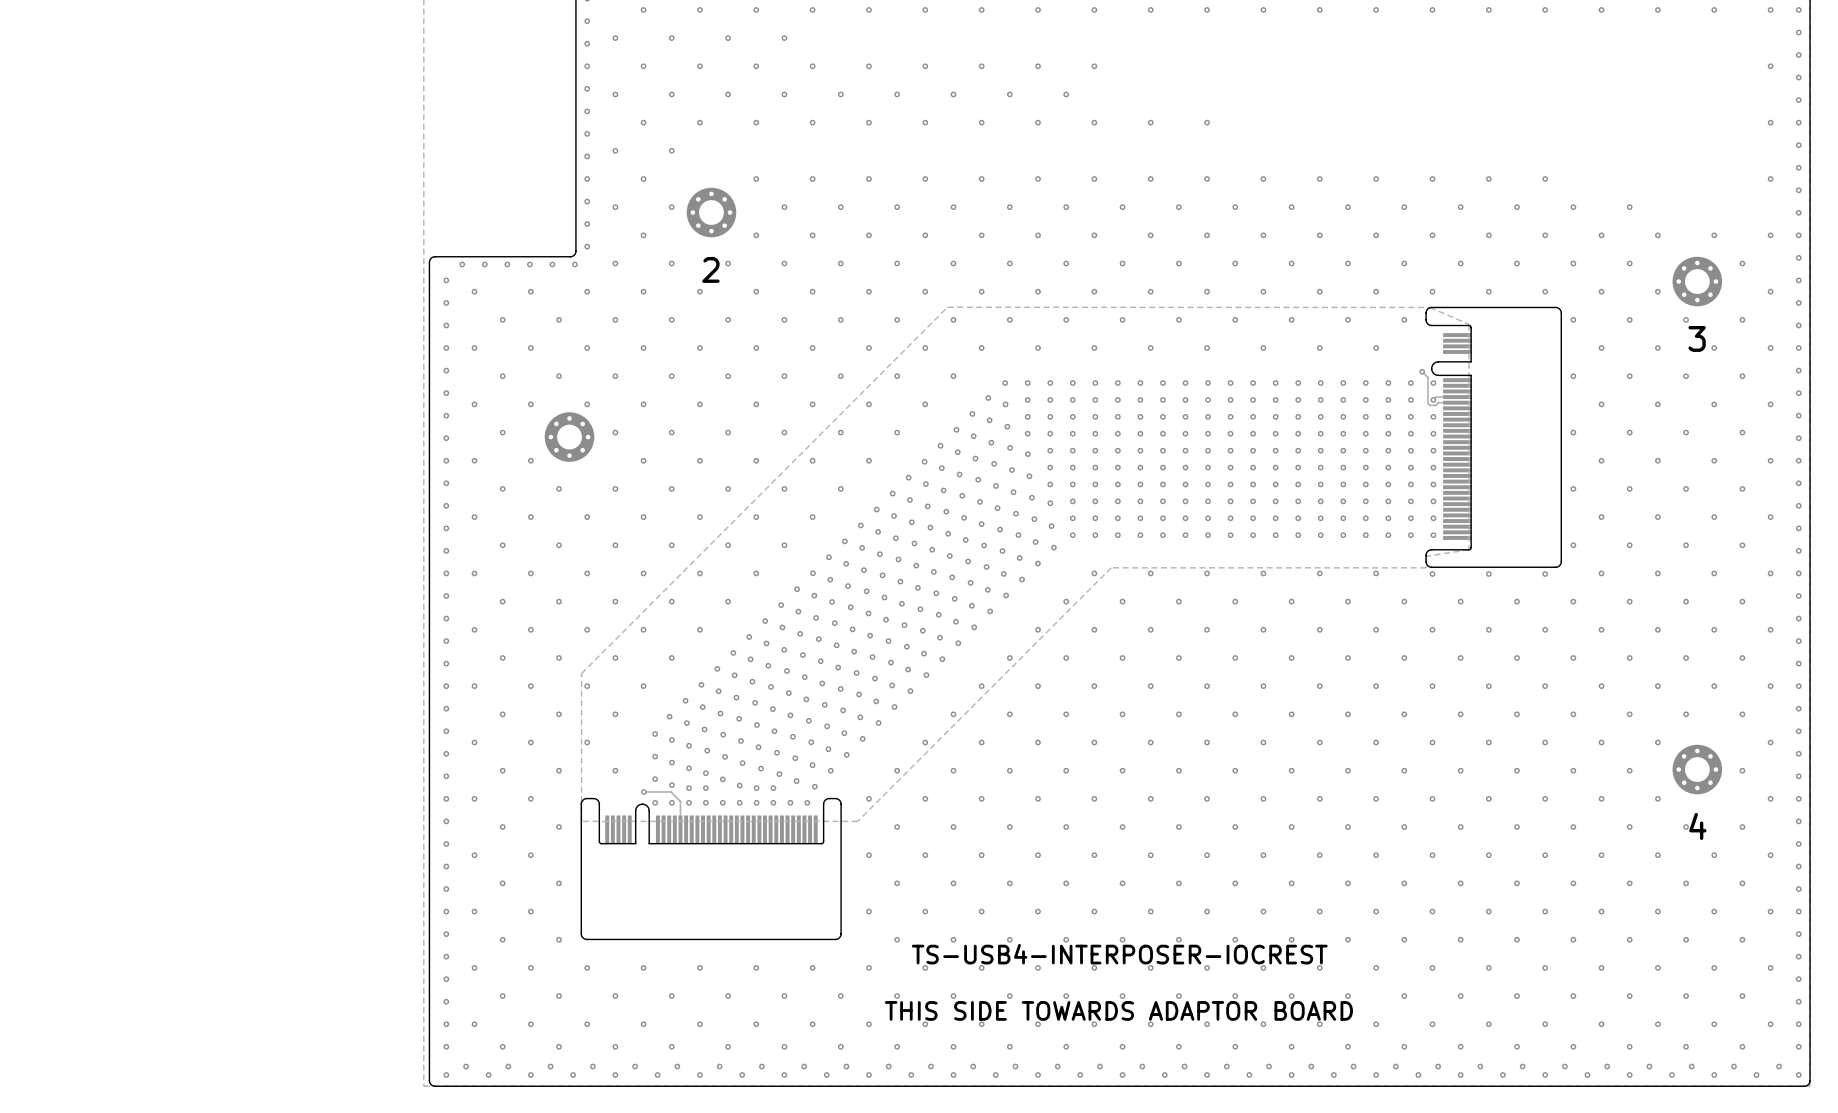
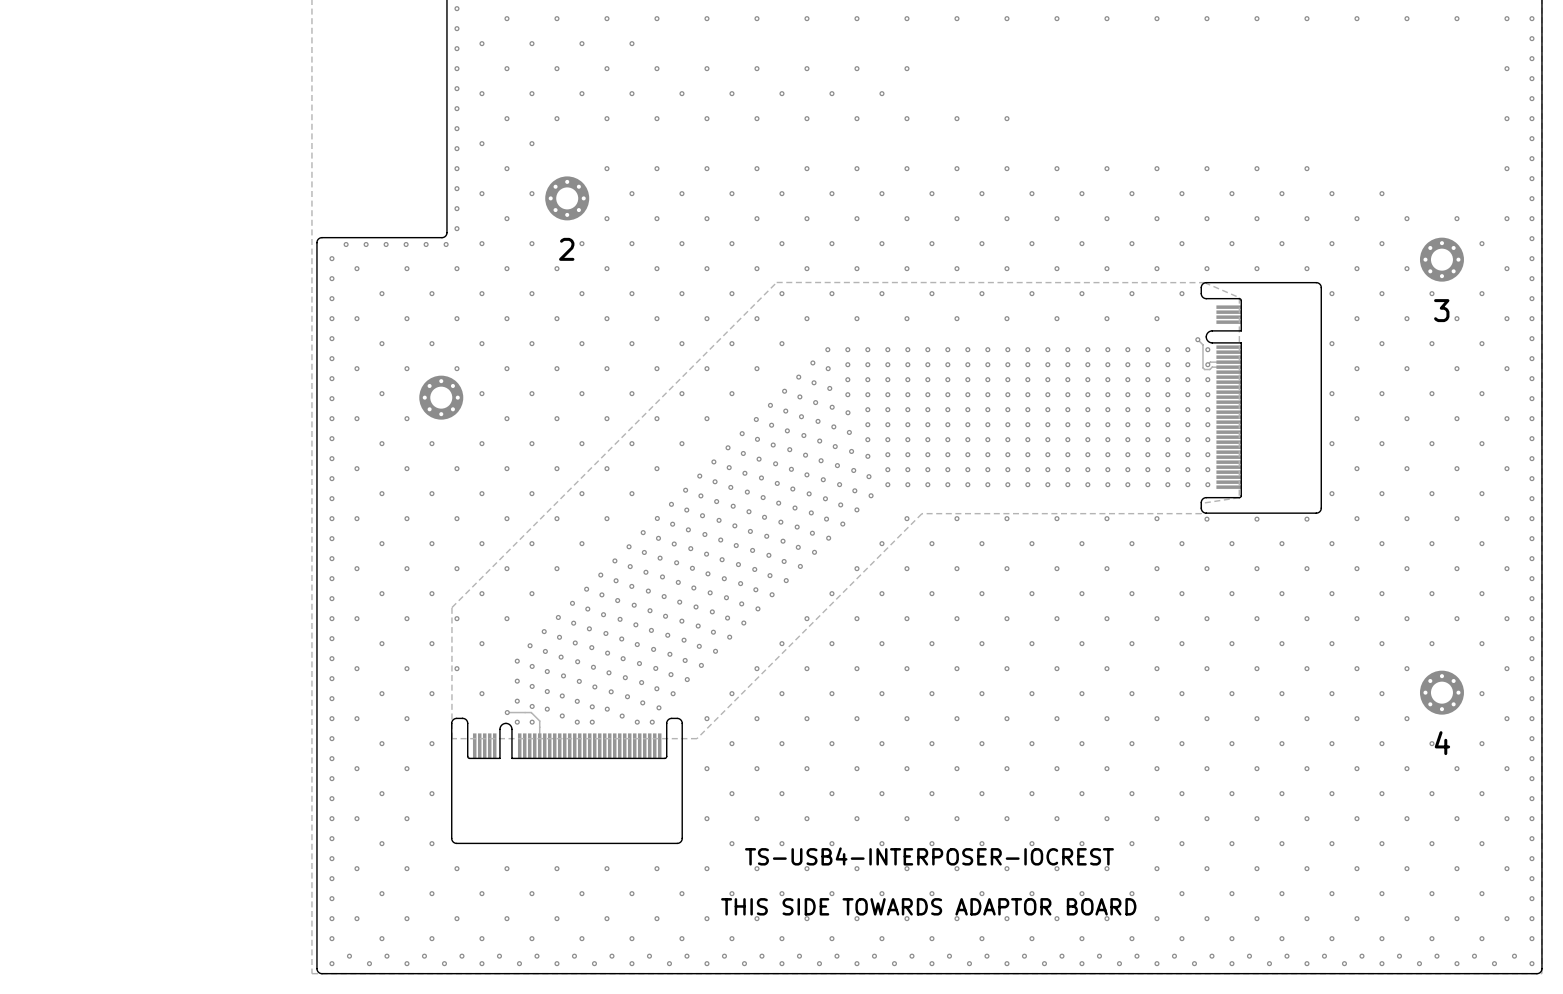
via: (705, 788) -> none
via: (773, 788) -> none
via: none -> (562, 715)
via: none -> (622, 716)
via: (688, 802) -> none
via: (705, 802) -> none
via: (756, 802) -> none
via: (773, 802) -> none

